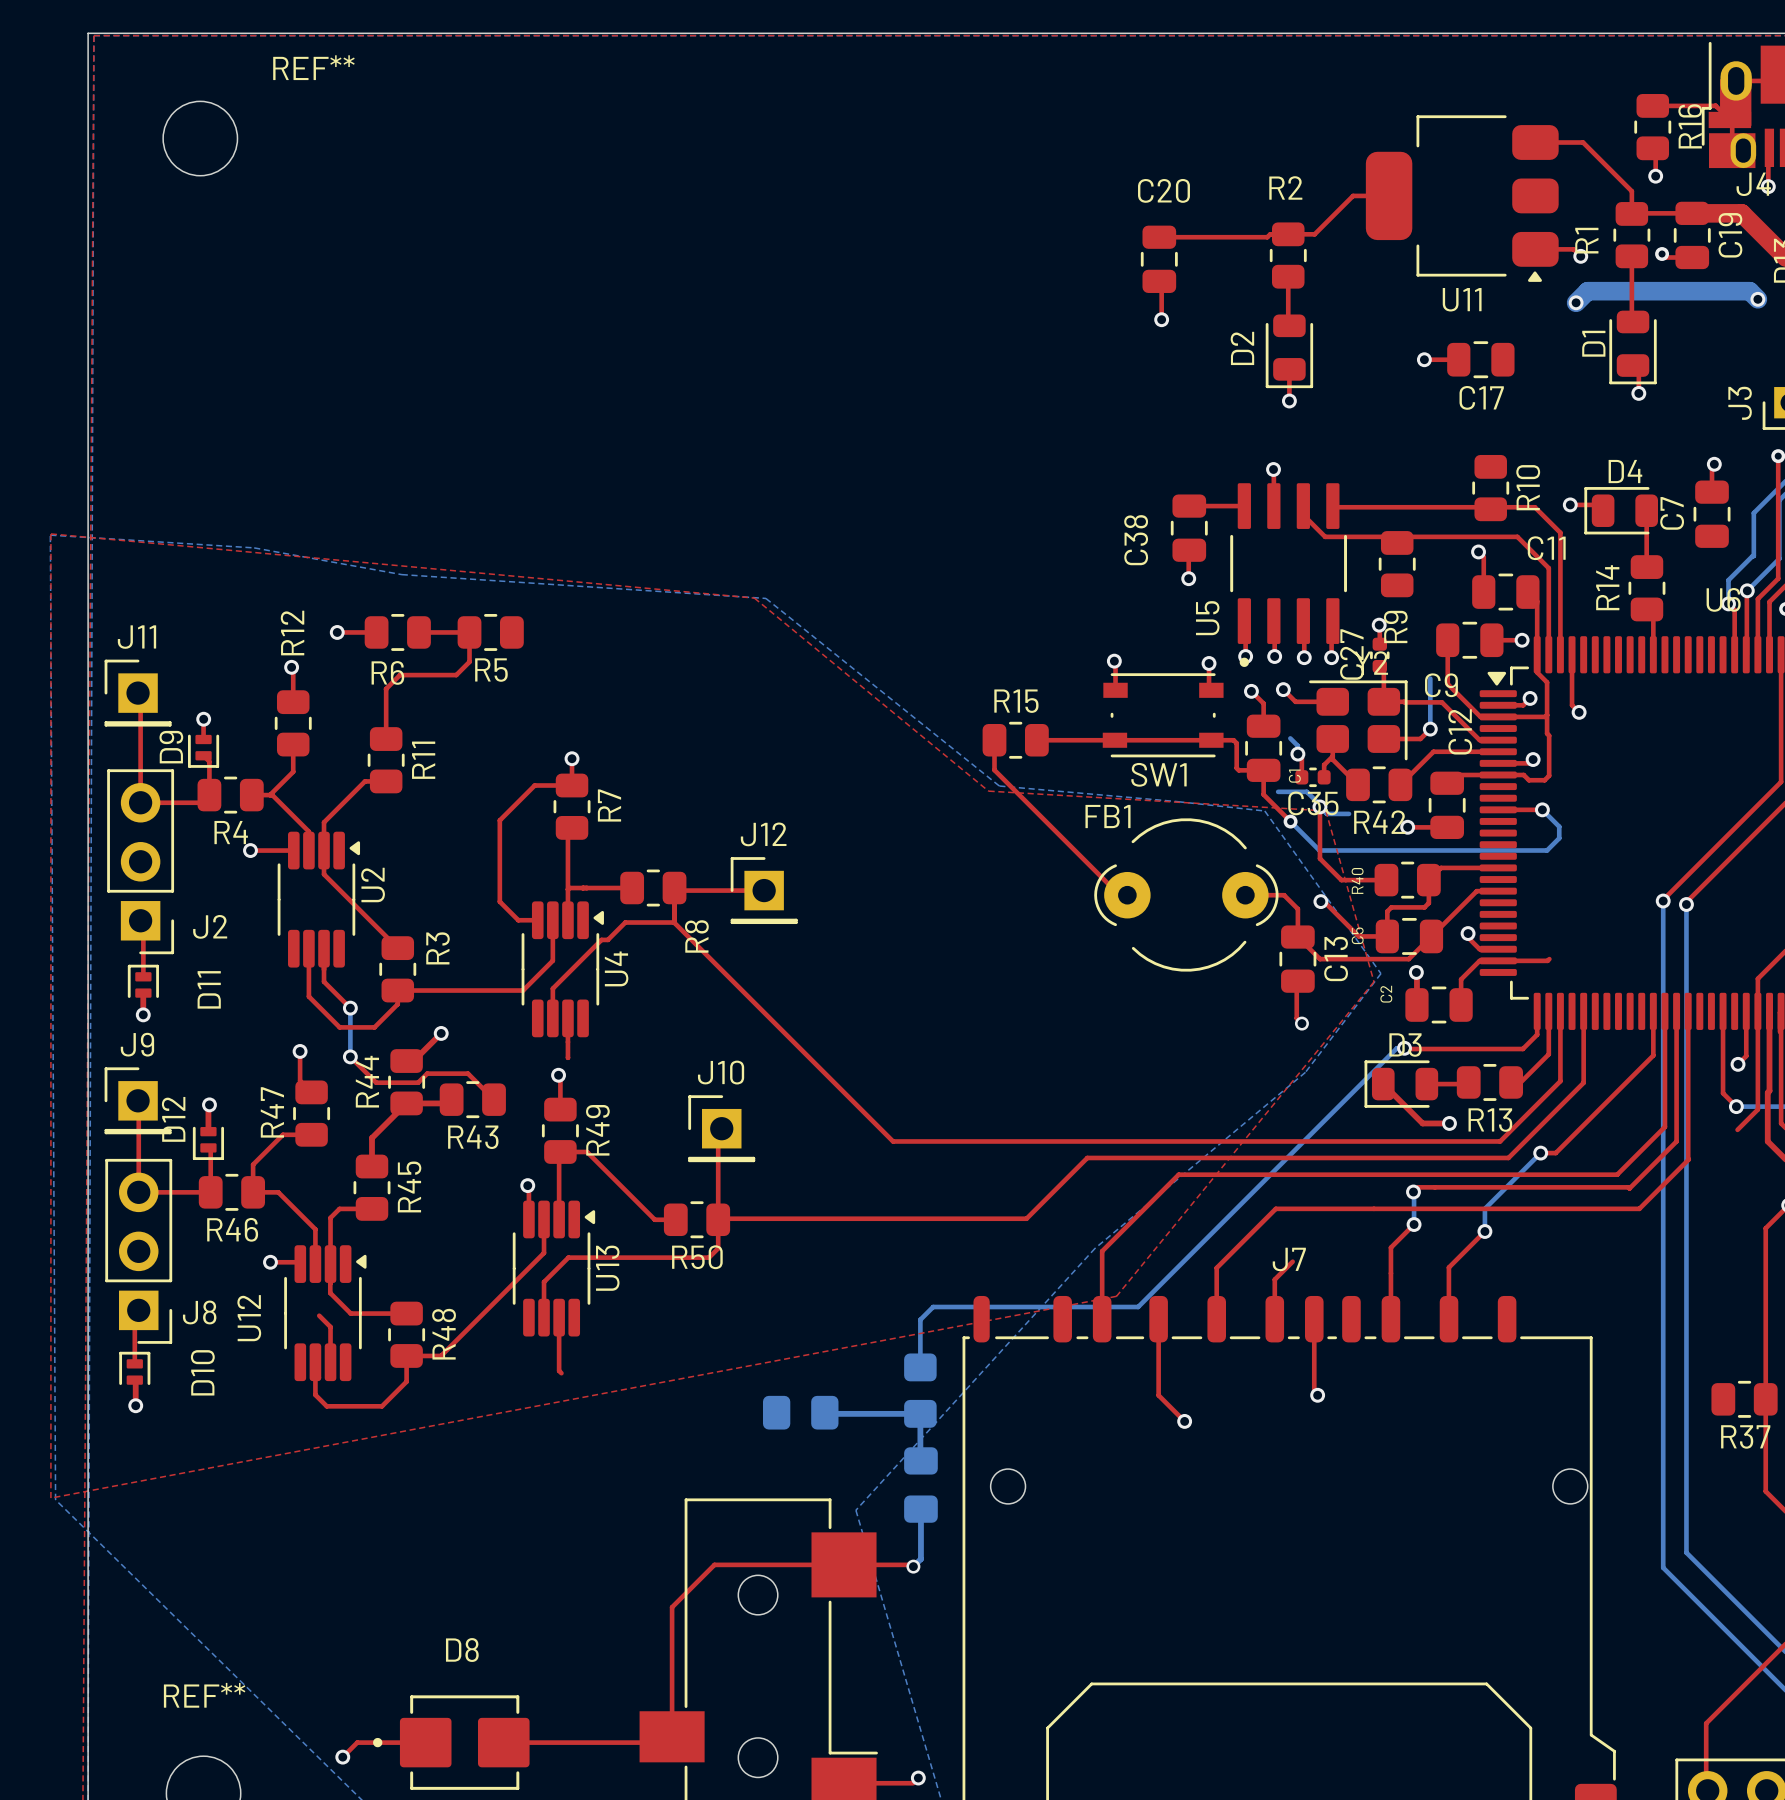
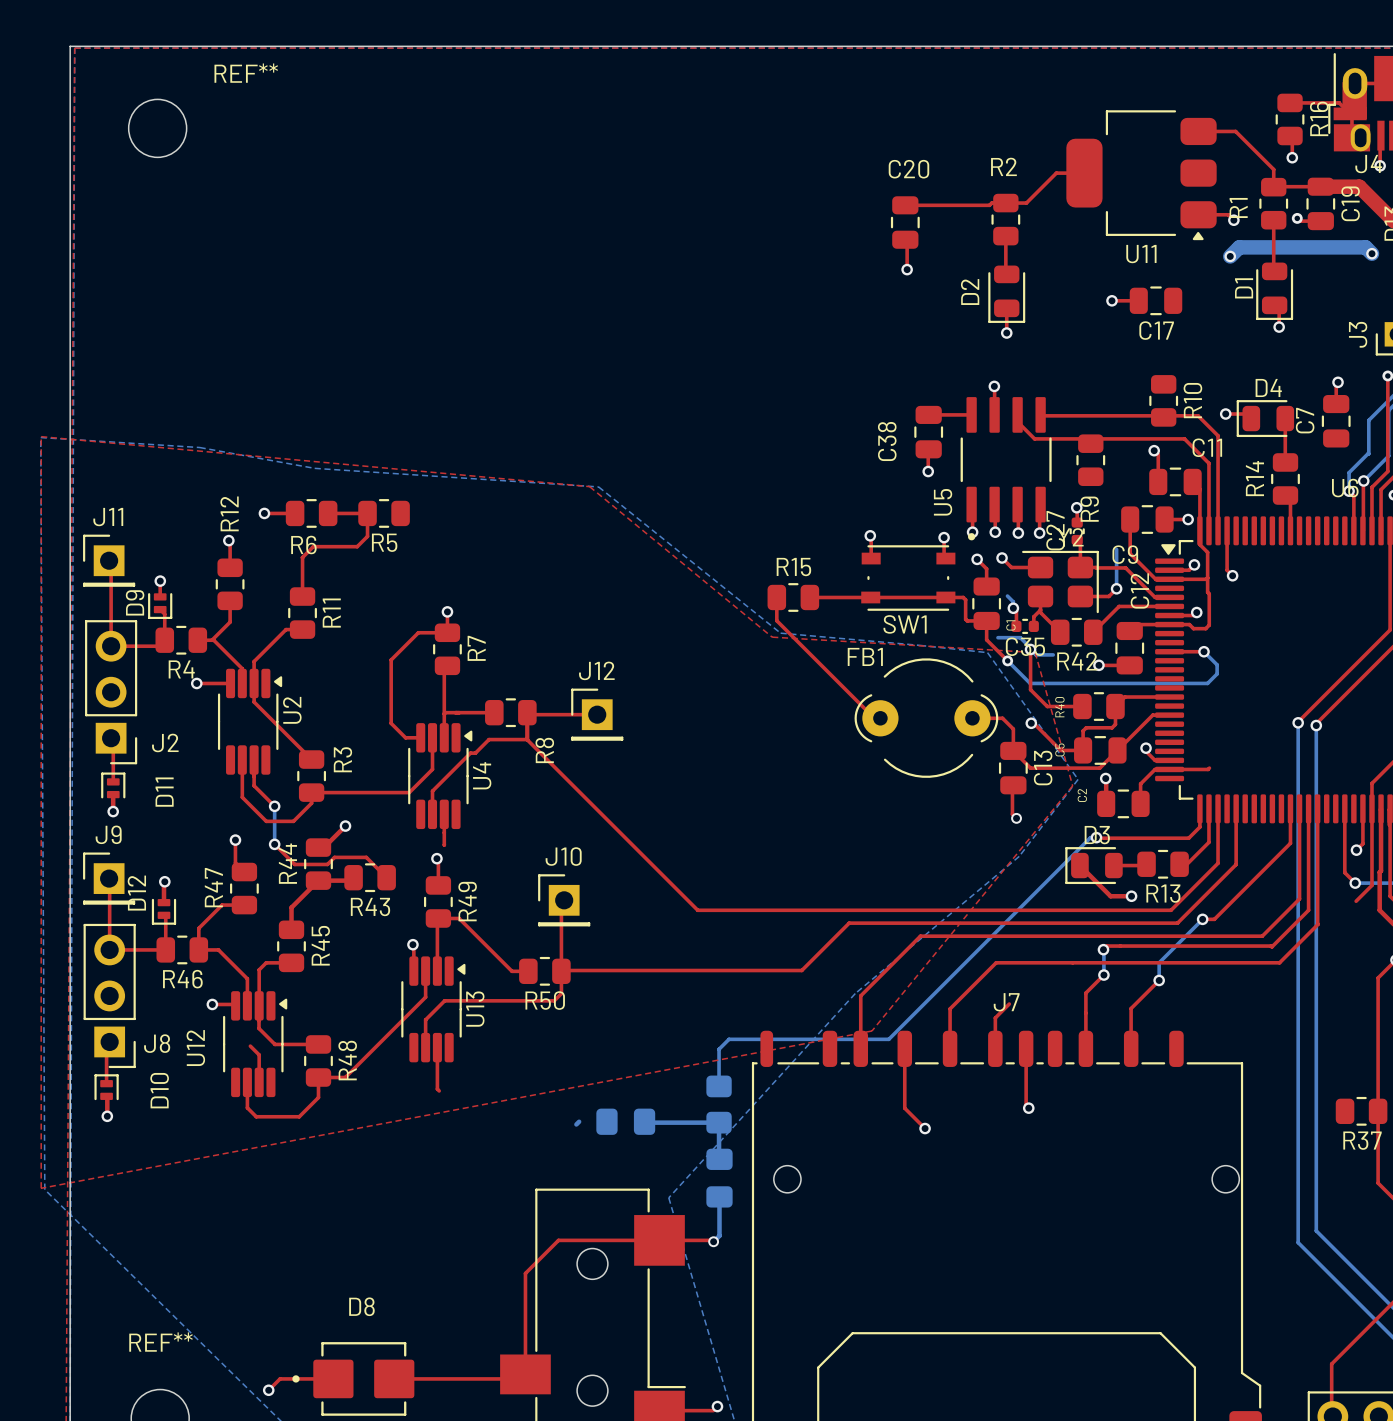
bottom track: none -> (579, 1121) (576, 1124)

